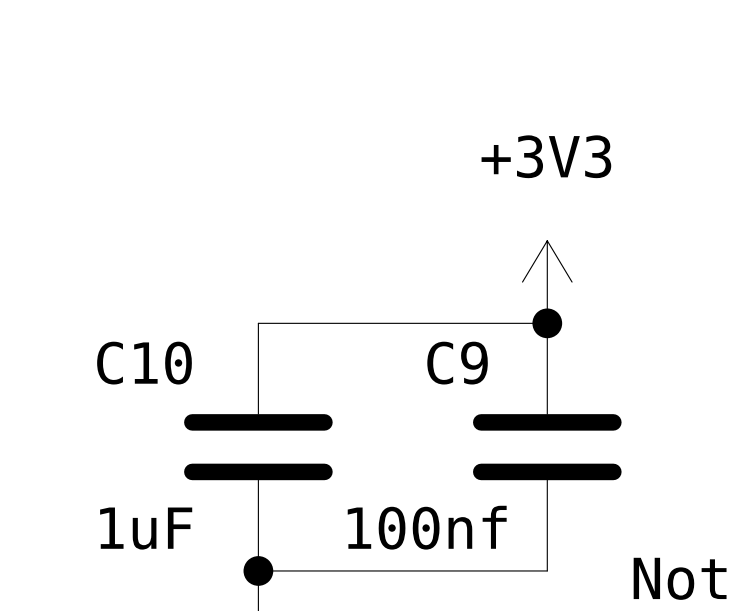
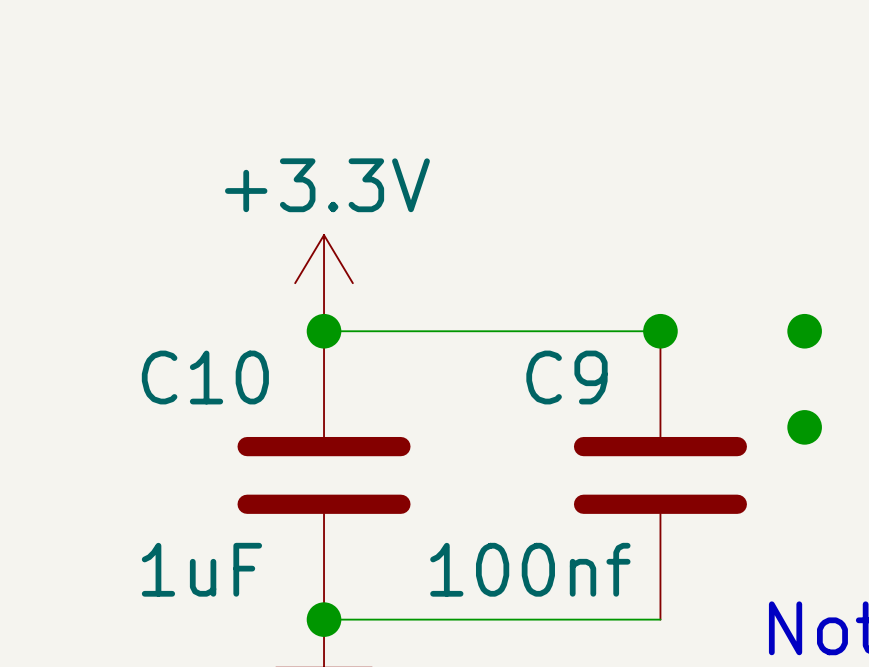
power symbol: none -> +3.3V (324, 283)
power symbol: +3V3 (547, 282) -> none
junction: none -> (324, 331)
junction: none -> (804, 331)
junction: none -> (804, 427)

